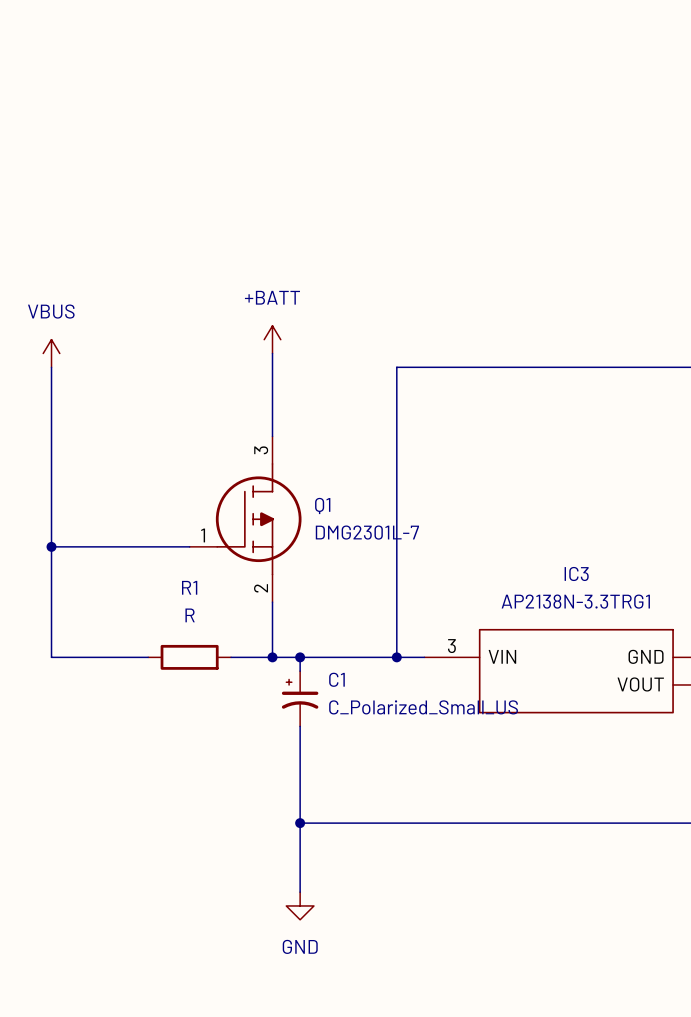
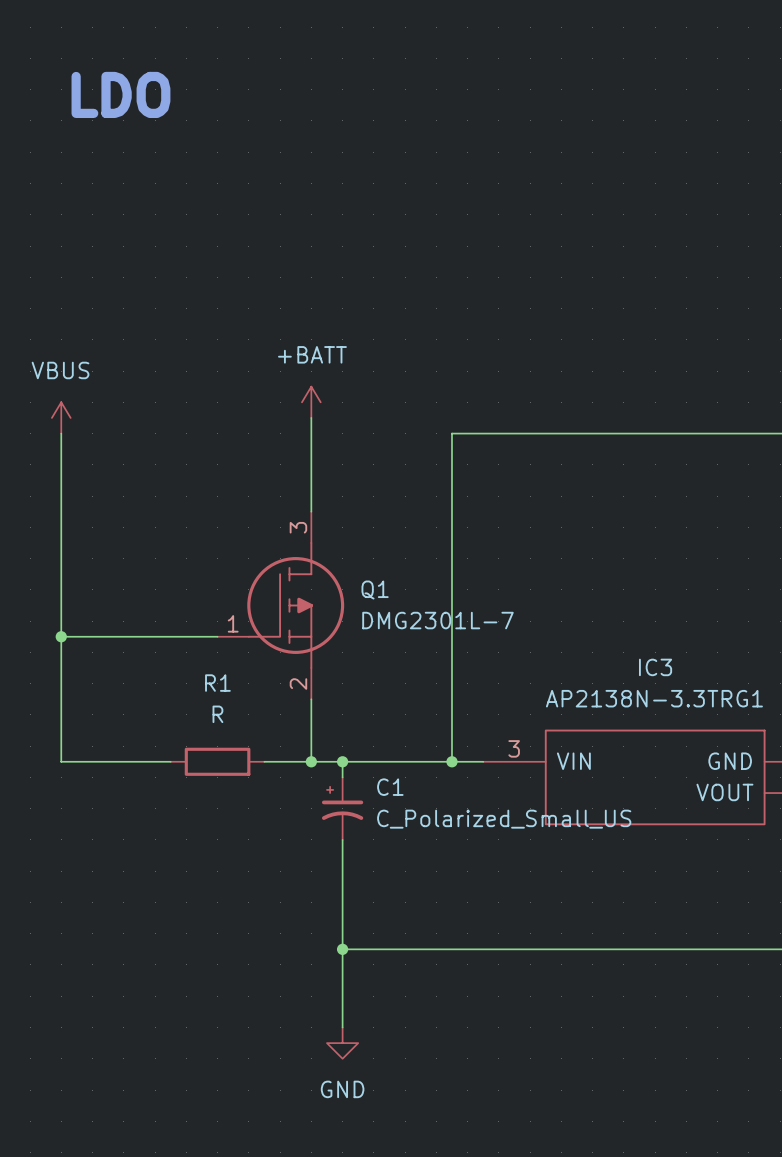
text: none -> LDO (120, 94)

